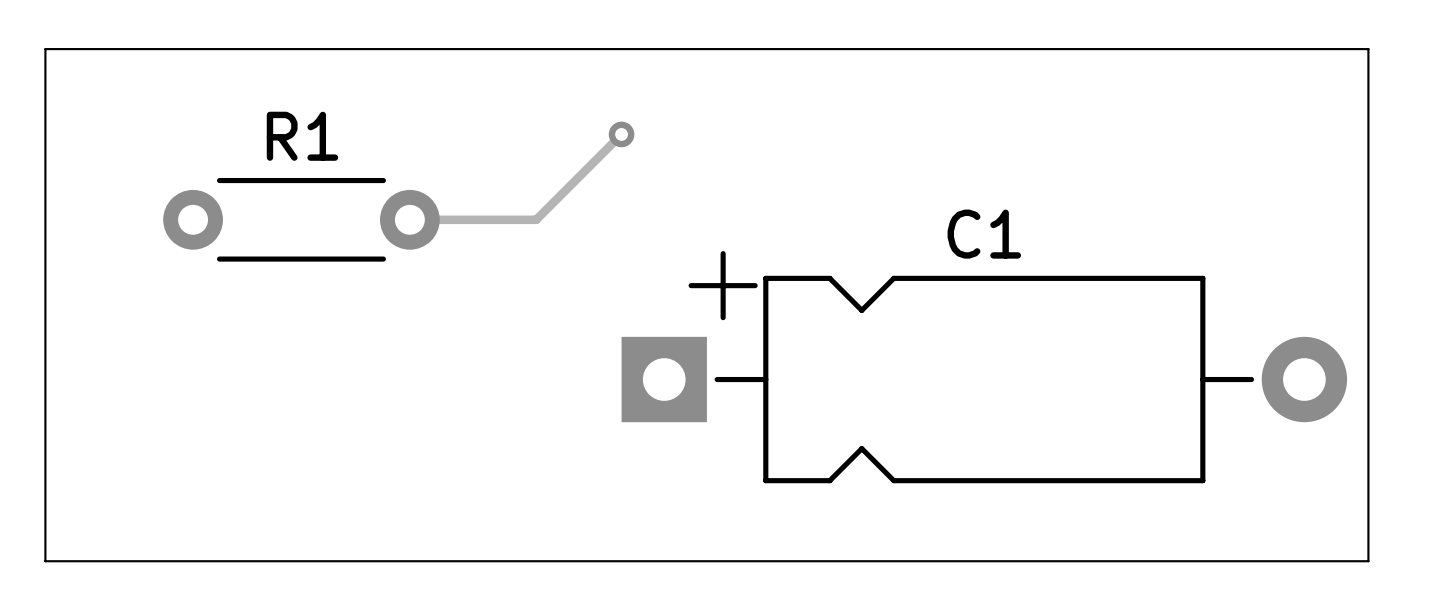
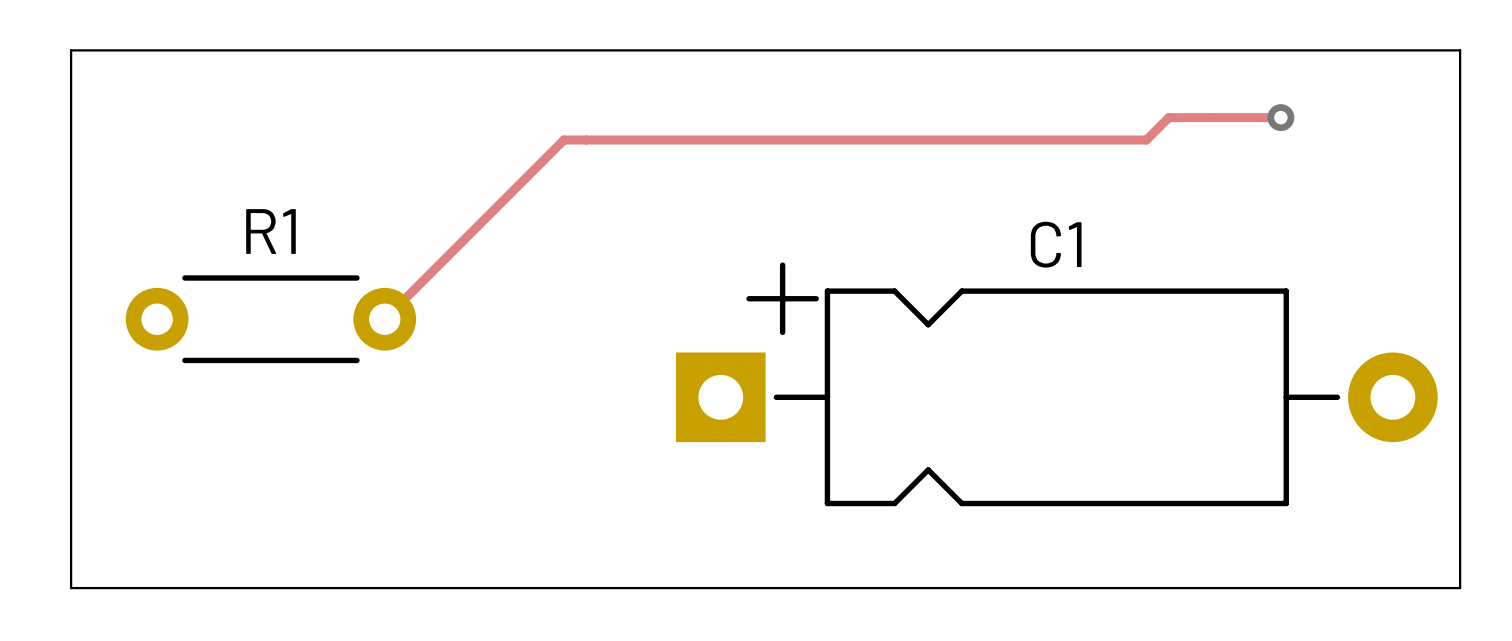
track: none -> (1280, 117) (1168, 117) (1146, 140) (563, 140) (384, 319)
via: none -> (1280, 117)
track: (621, 134) (536, 219) (409, 219) -> none
via: (621, 134) -> none
R1 position: (301, 219) -> (270, 319)

